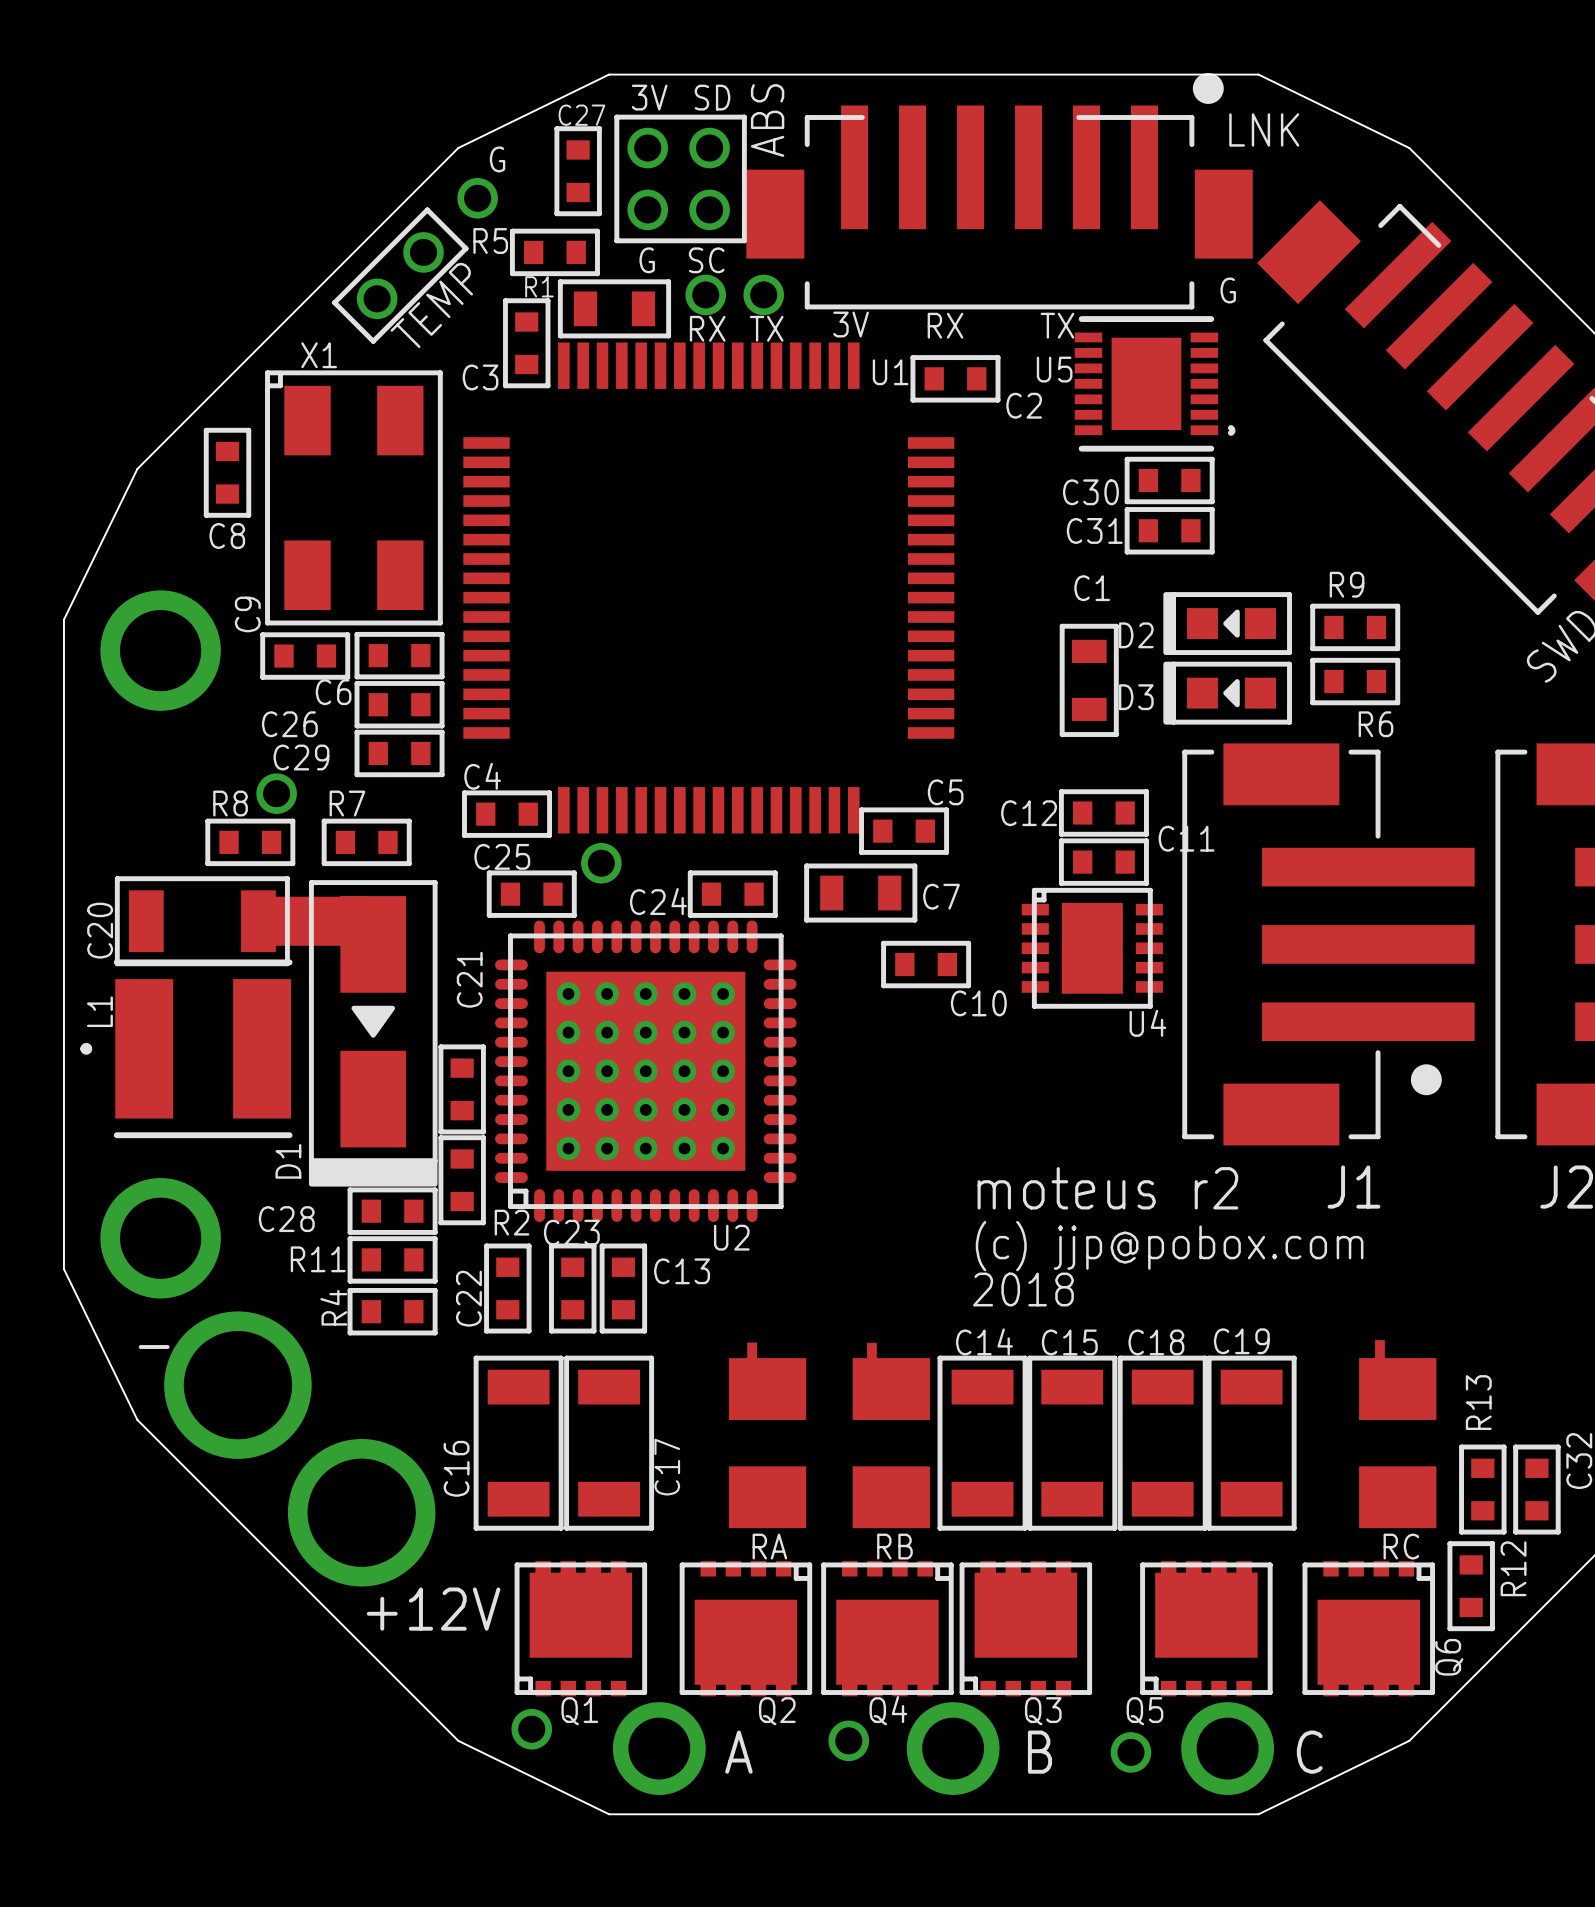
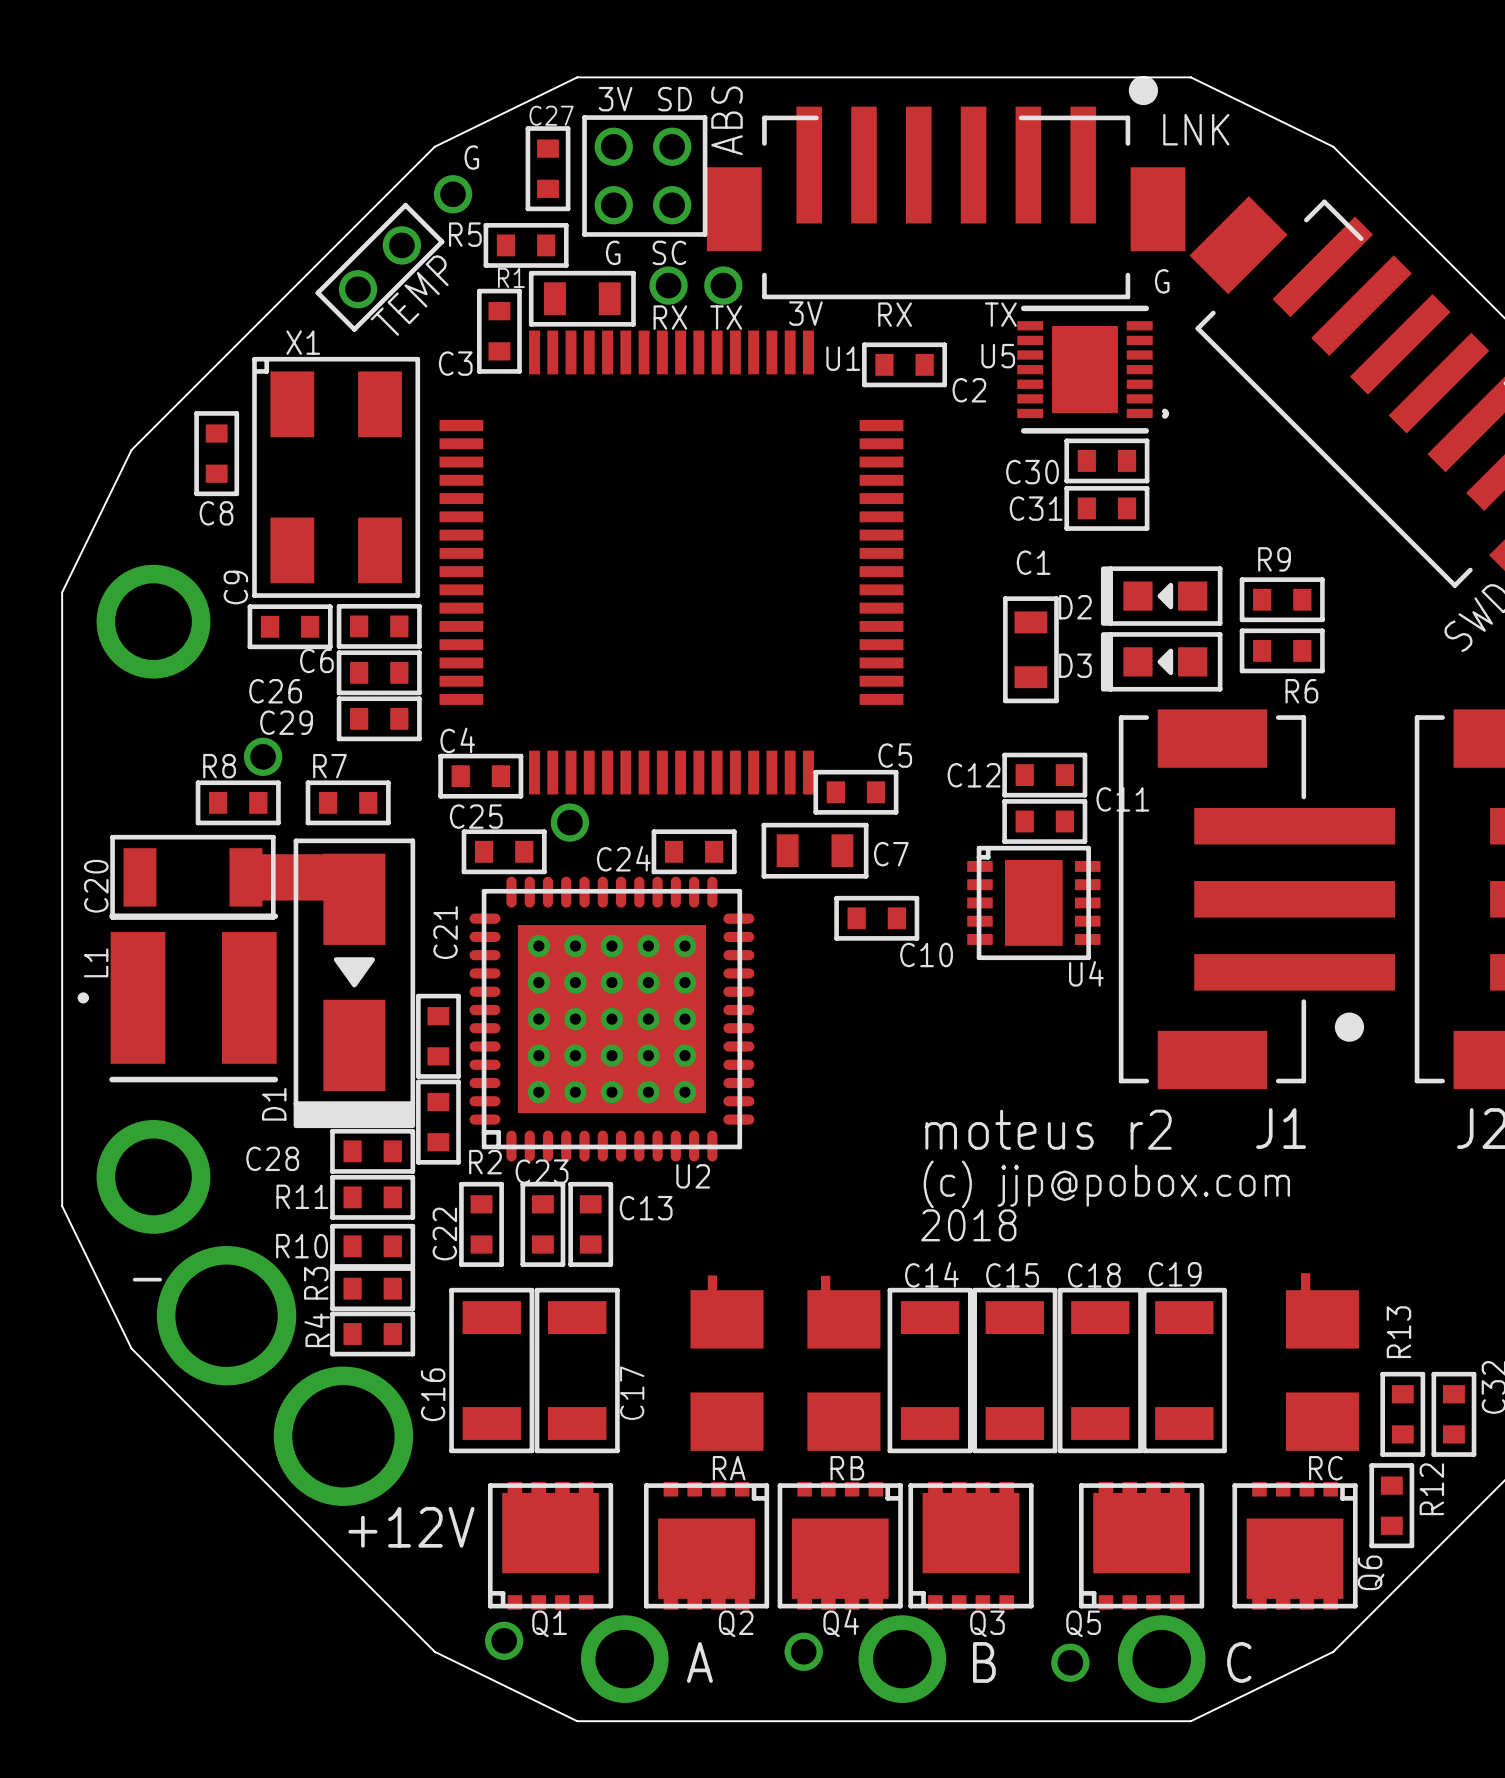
R4 name: R4 (333, 1307) -> R10 (302, 1246)
R3: none -> (372, 1288)
R4: none -> (372, 1333)

